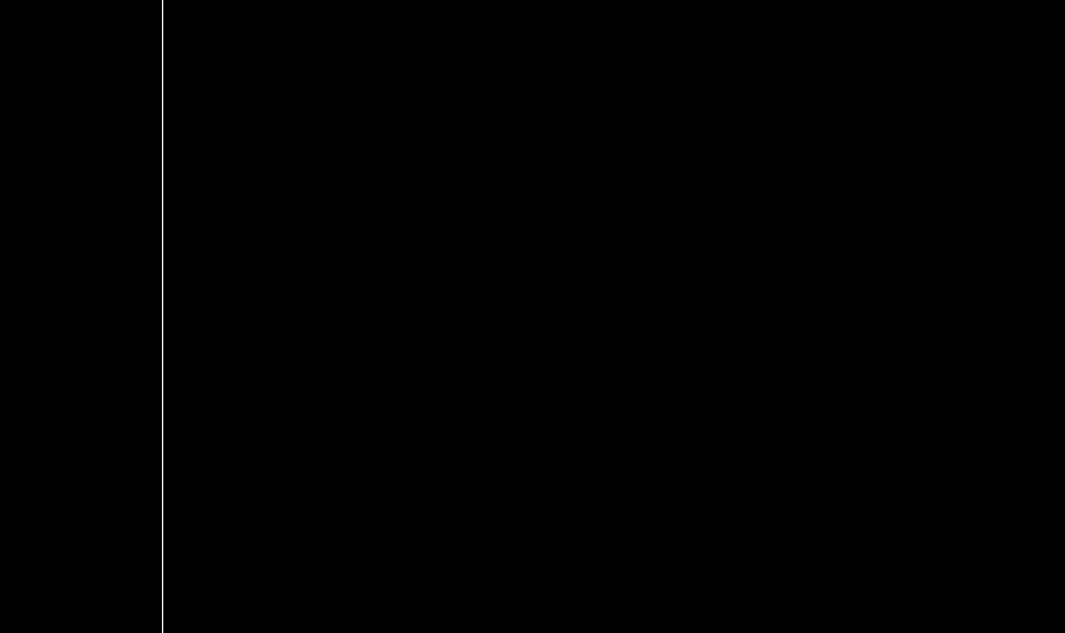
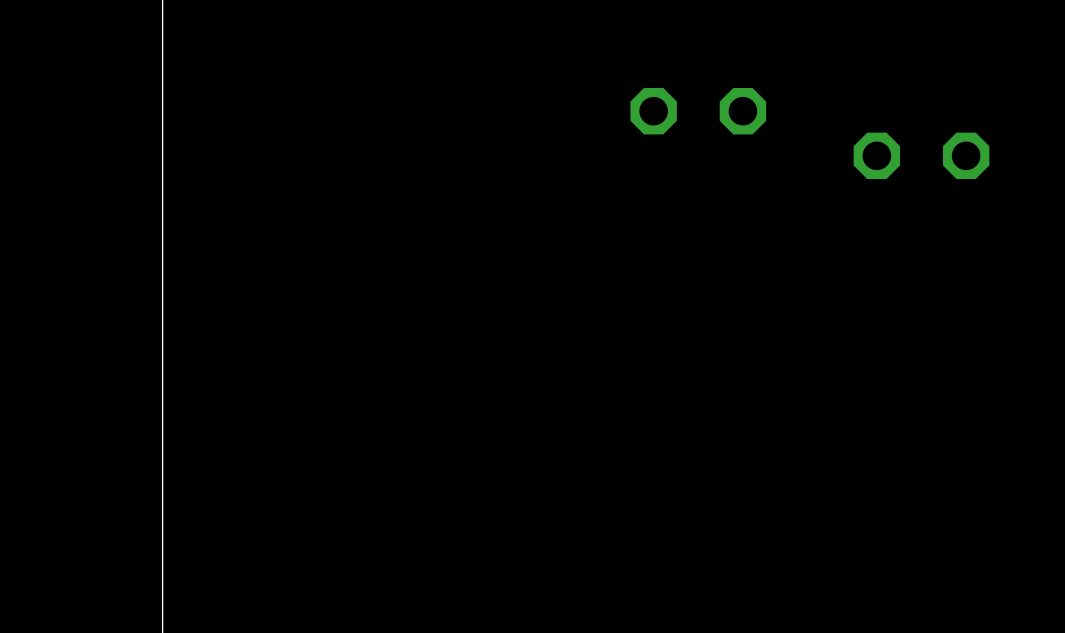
part: none -> (698, 111)
part: none -> (921, 155)

